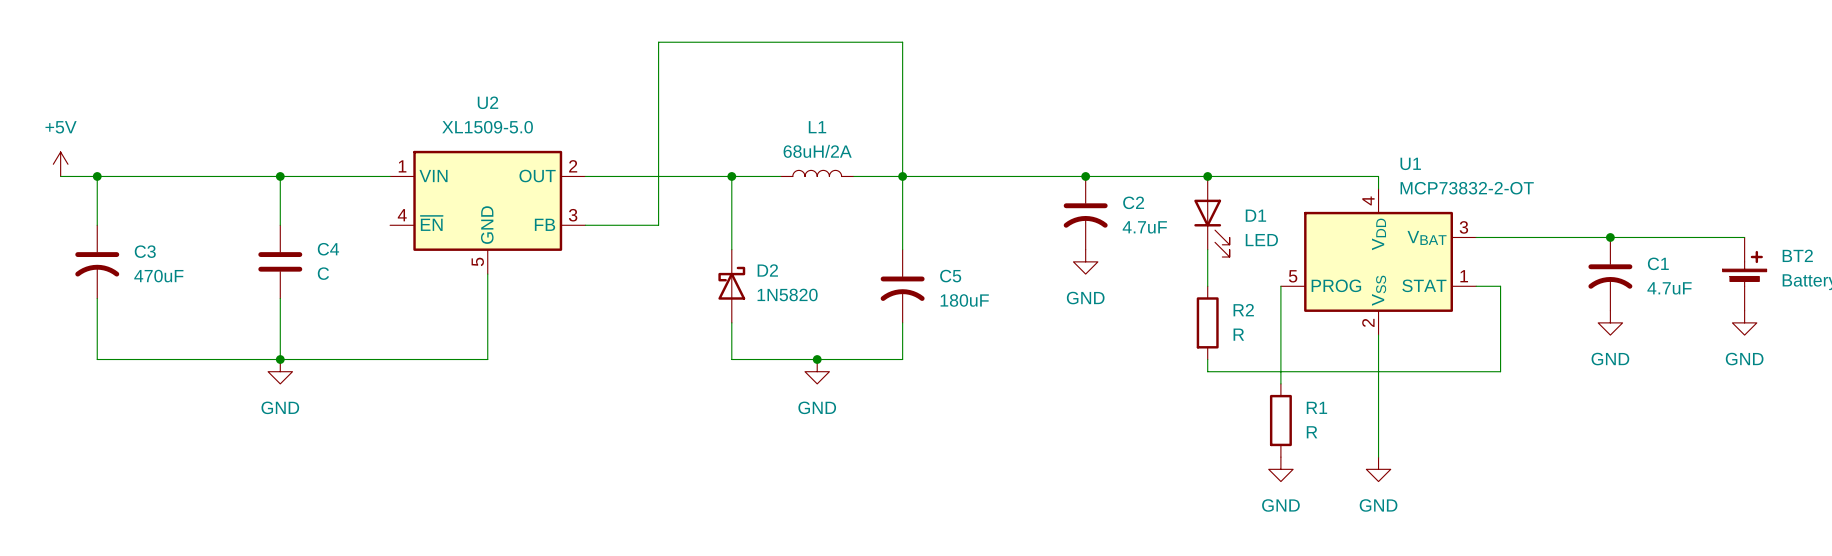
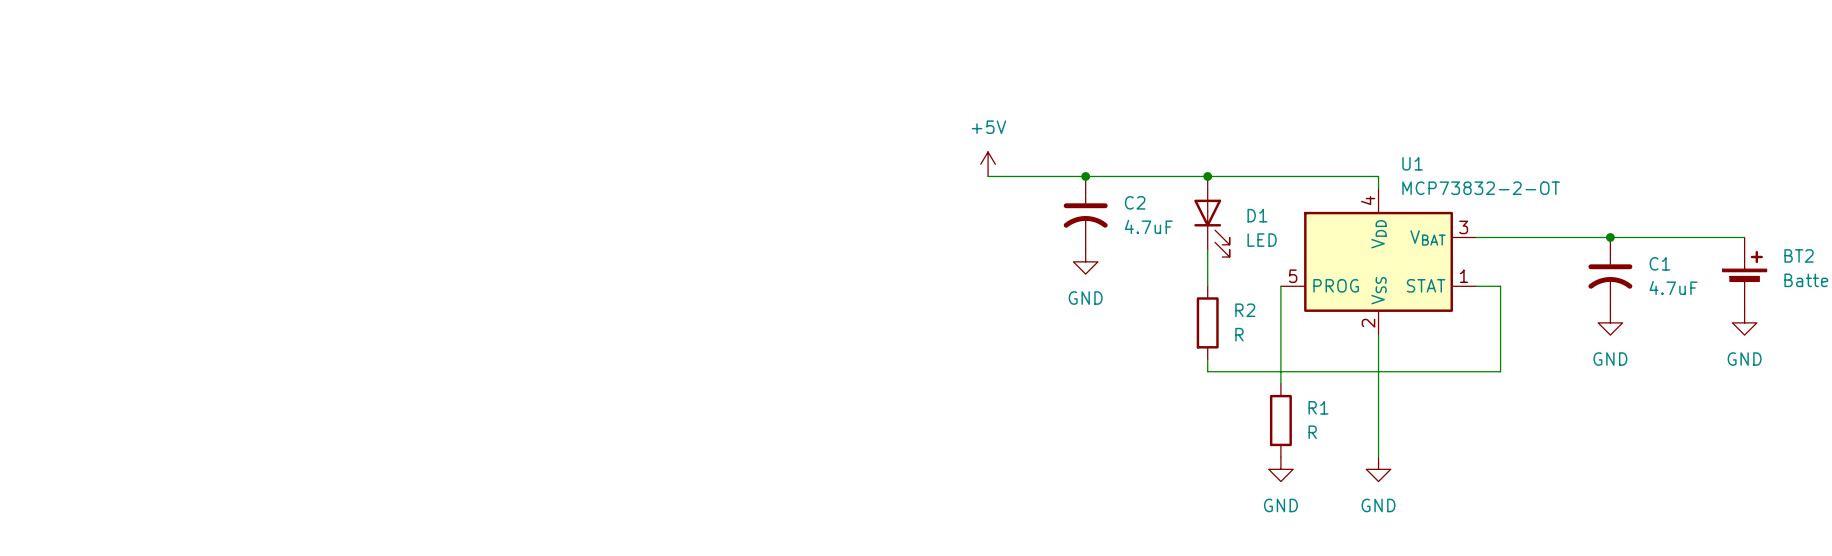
power symbol: +5V (60, 164) -> none
power symbol: none -> +5V (988, 164)
L1: 68uH/2A (817, 173) -> none
wire: (60, 176) (390, 176) -> none
wire: (97, 176) (97, 225) -> none
junction: (97, 176) -> none
wire: (280, 176) (280, 225) -> none
junction: (280, 176) -> none
wire: (585, 176) (780, 176) -> none
wire: (731, 176) (731, 249) -> none
junction: (731, 176) -> none
wire: (853, 176) (988, 176) -> none
junction: (902, 176) -> none
U2: XL1509-5.0 (487, 212) -> none
wire: (585, 225) (658, 225) (658, 42) (902, 42) (902, 249) -> none
C3: 470uF (97, 261) -> none
C4: C (280, 261) -> none
wire: (487, 274) (487, 359) (97, 359) (97, 298) -> none
D2: 1N5820 (731, 286) -> none
C5: 180uF (902, 286) -> none
wire: (280, 298) (280, 359) -> none
wire: (731, 322) (731, 359) (902, 359) (902, 322) -> none
junction: (280, 359) -> none
junction: (817, 359) -> none
power symbol: GND (280, 371) -> none
power symbol: GND (817, 371) -> none

